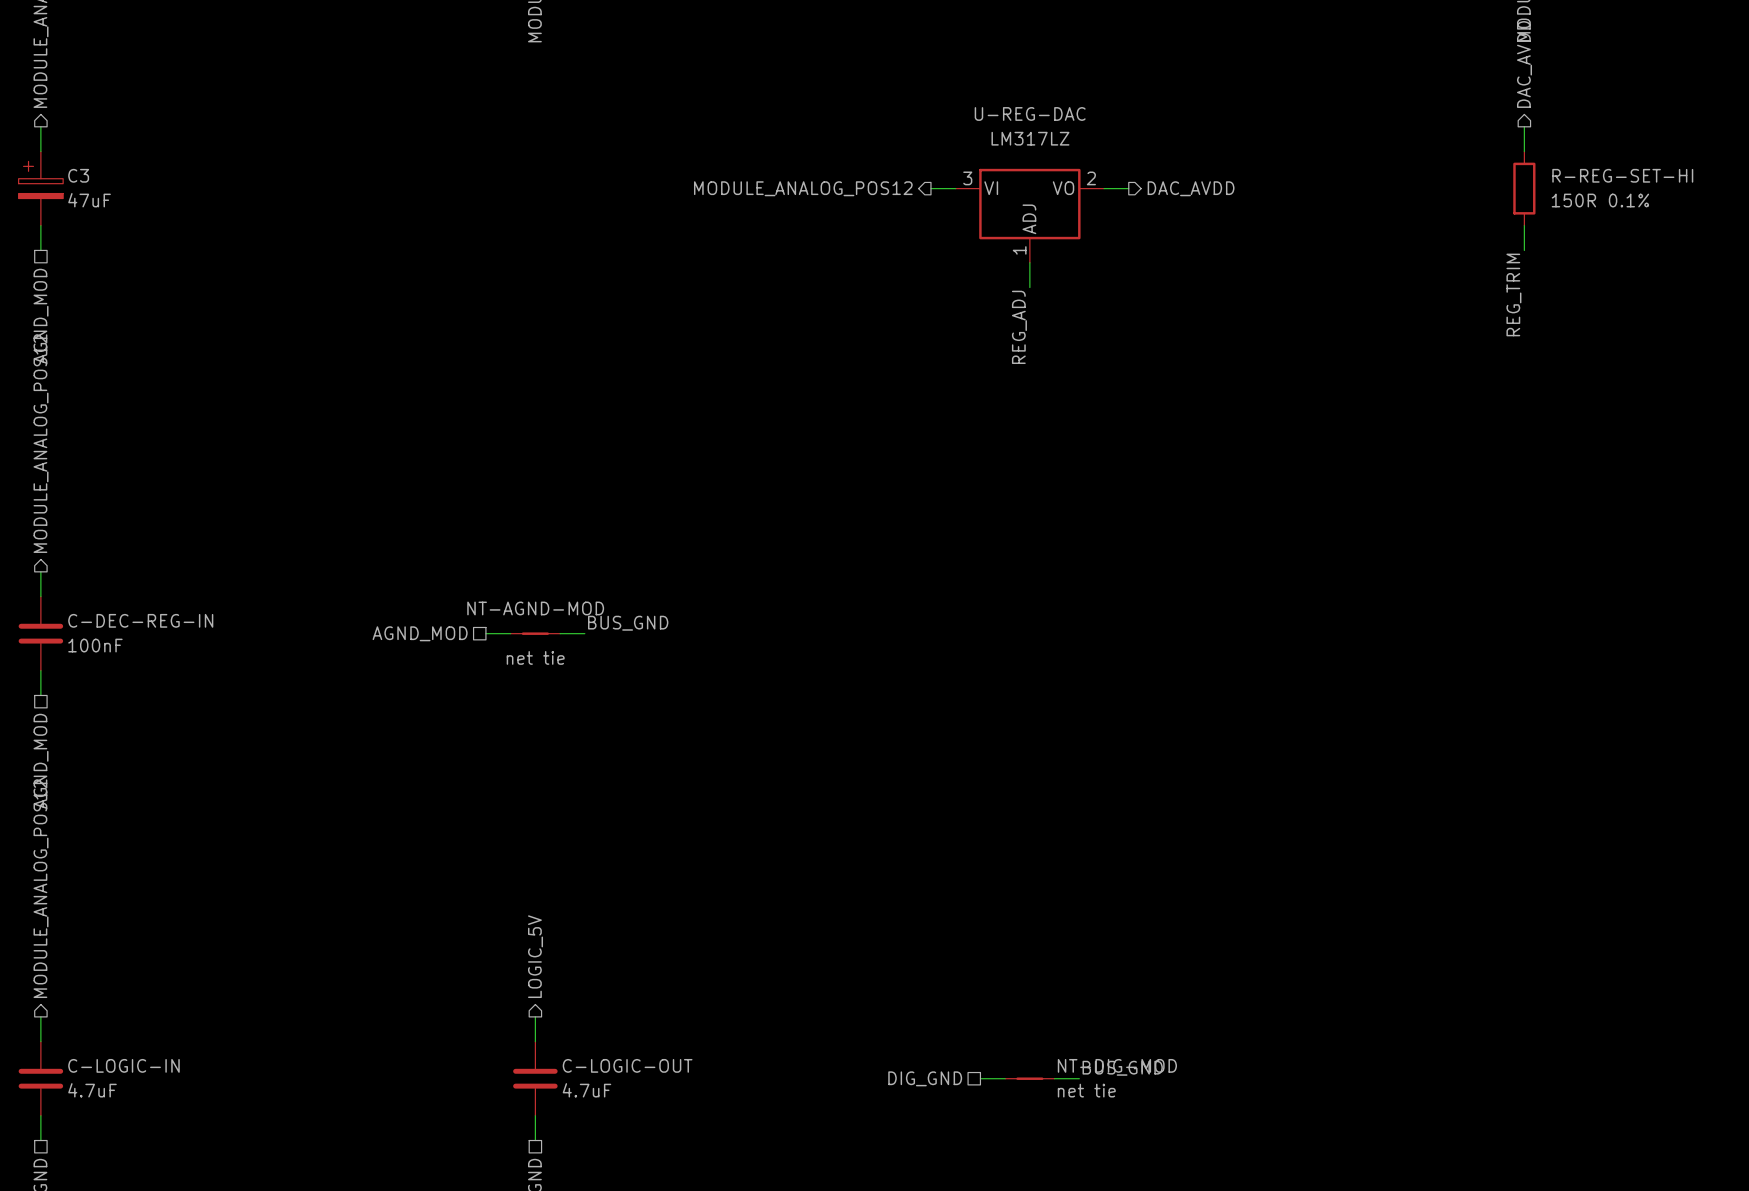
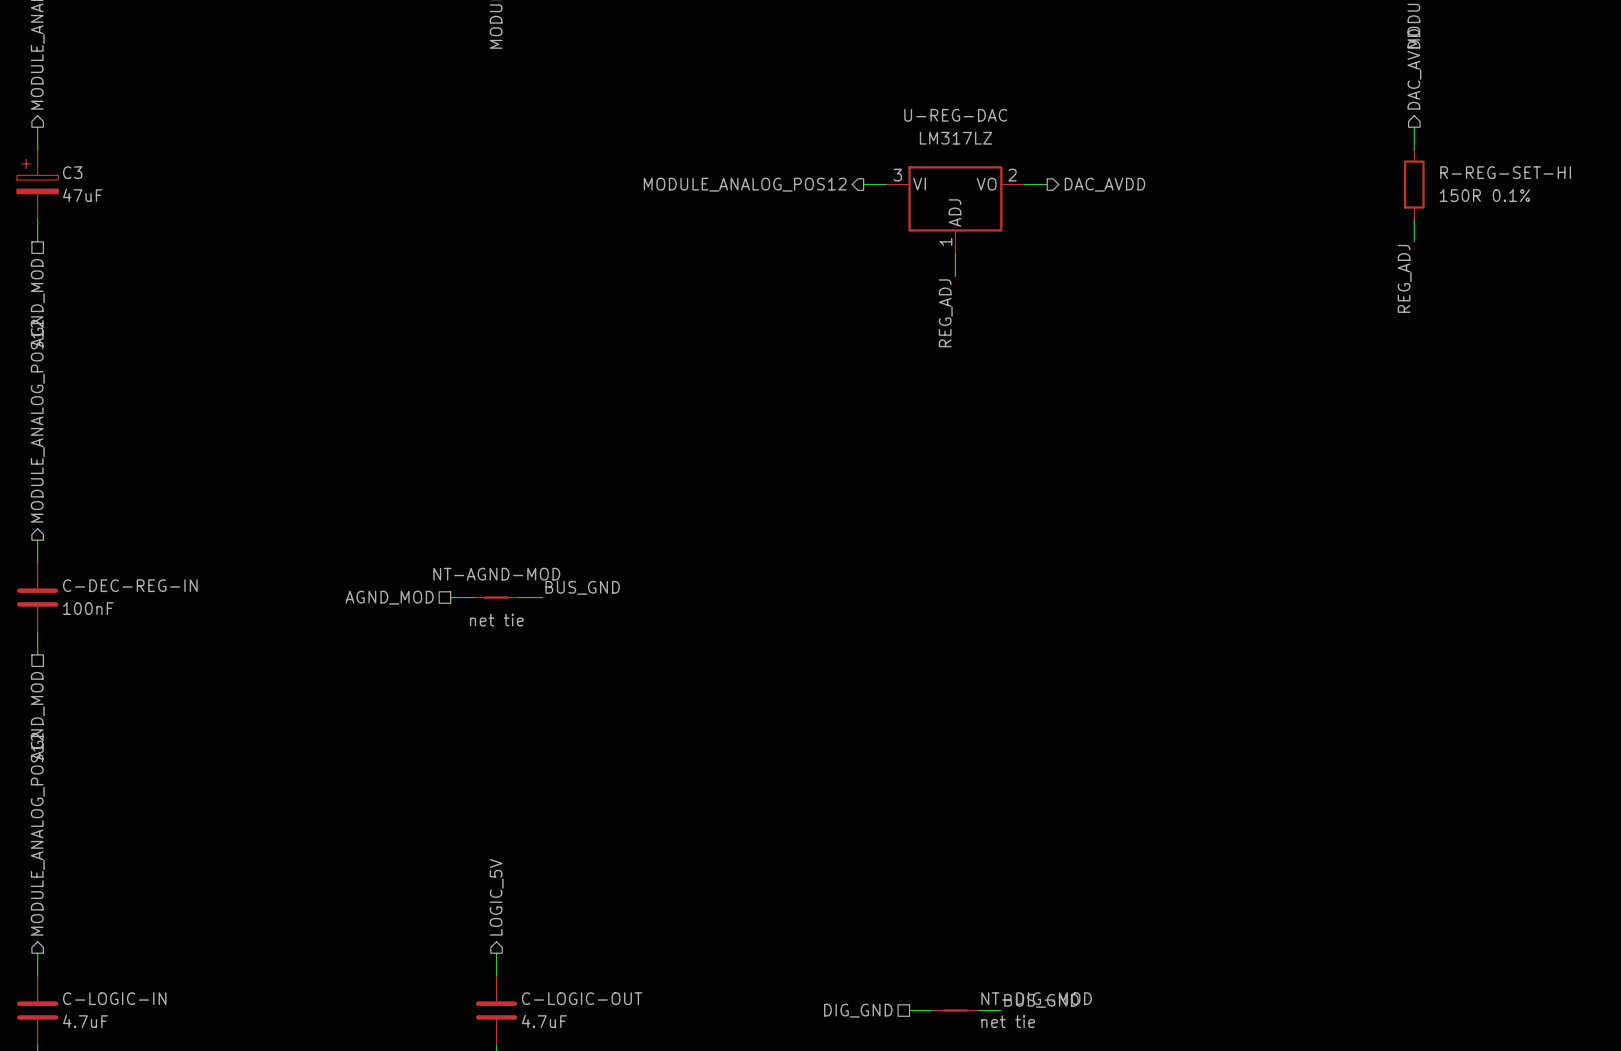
label: REG_TRIM (1513, 294) -> REG_ADJ (1404, 278)

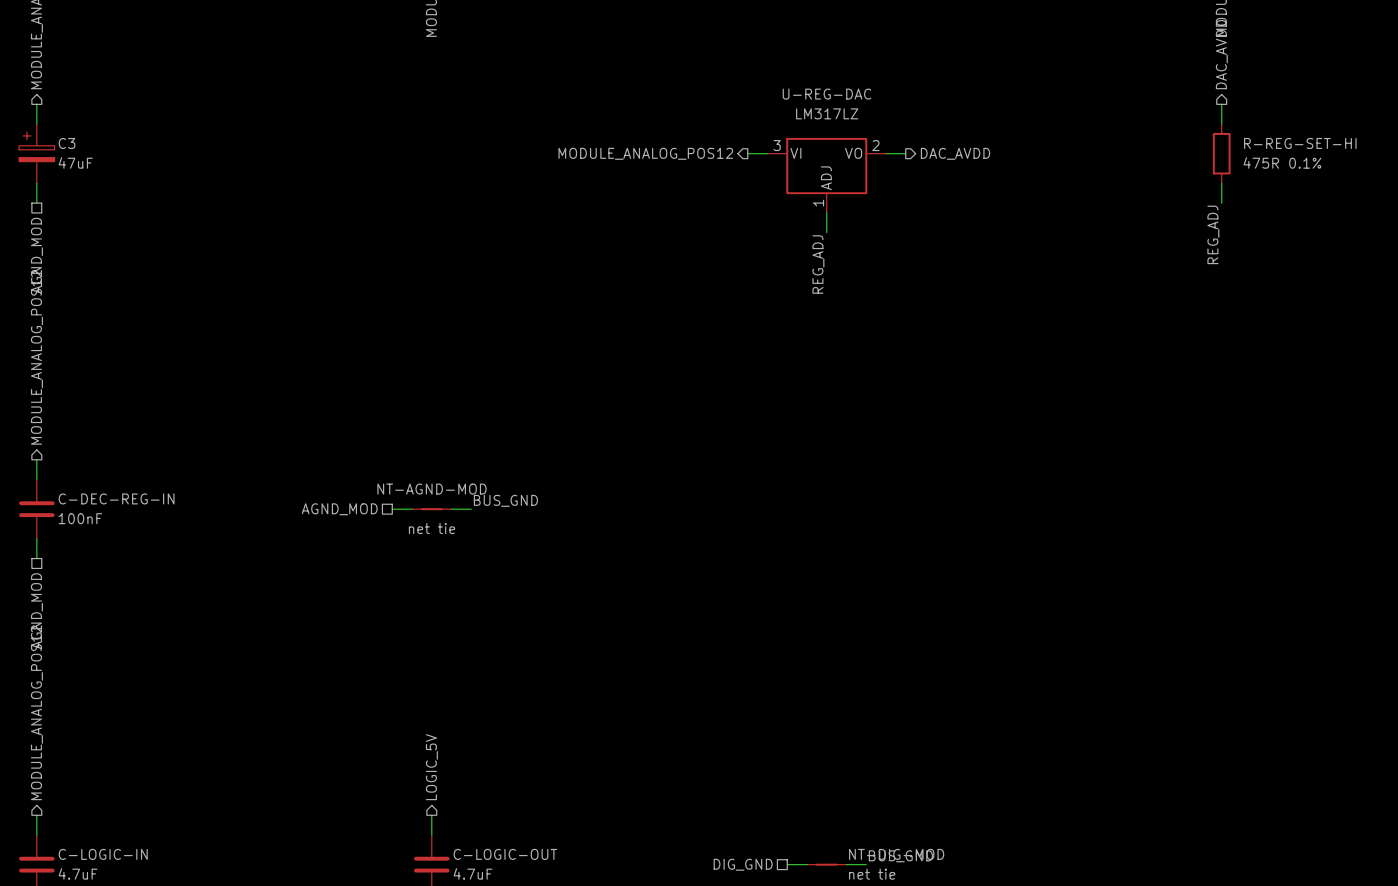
R-REG-SET-HI value: 150R 0.1% (1484, 195) -> 475R 0.1% (1282, 162)

